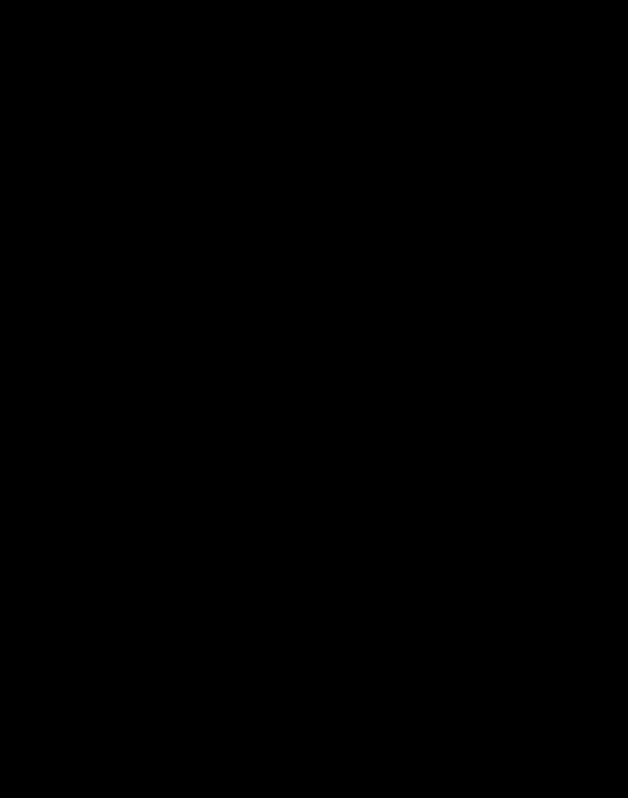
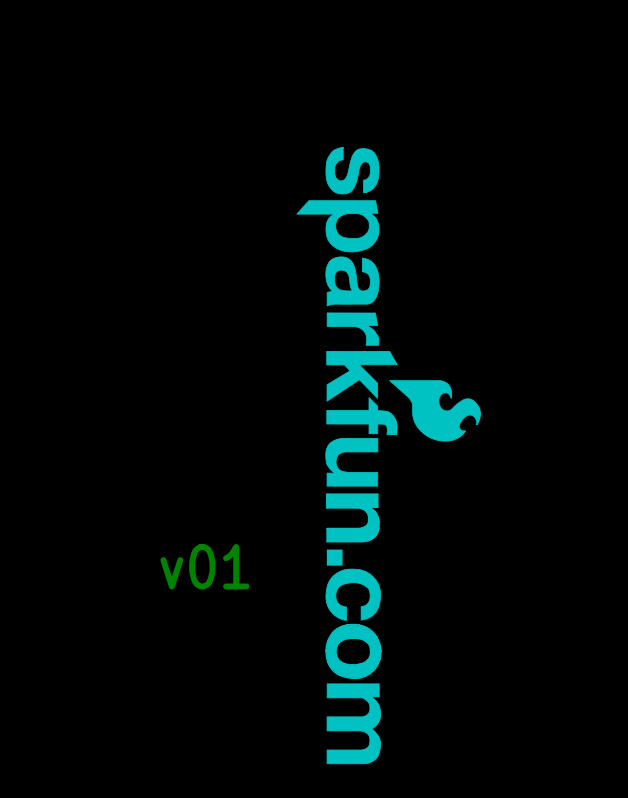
drawing: none -> [296, 147, 481, 765]
text: none -> v01 (204, 566)

